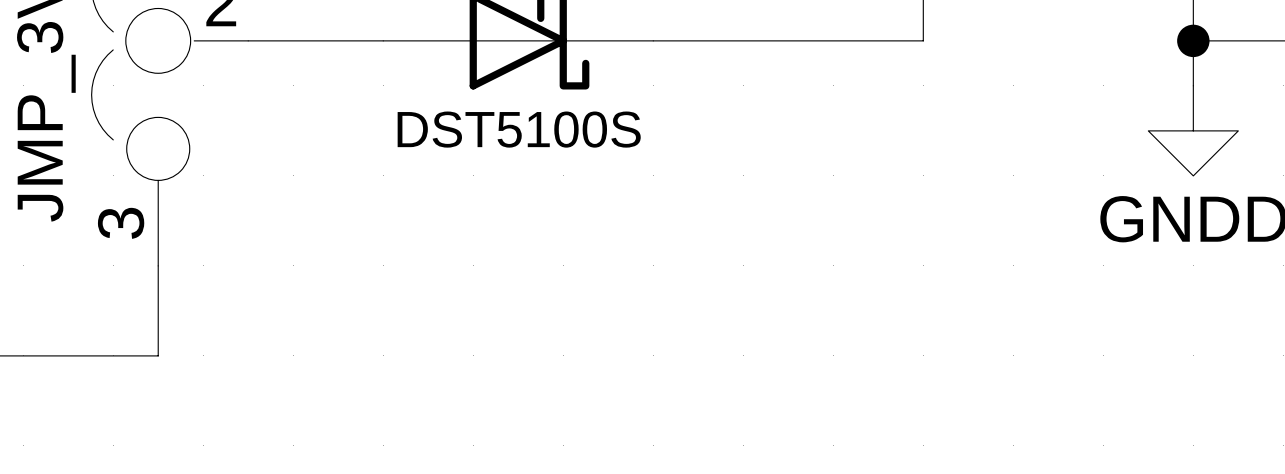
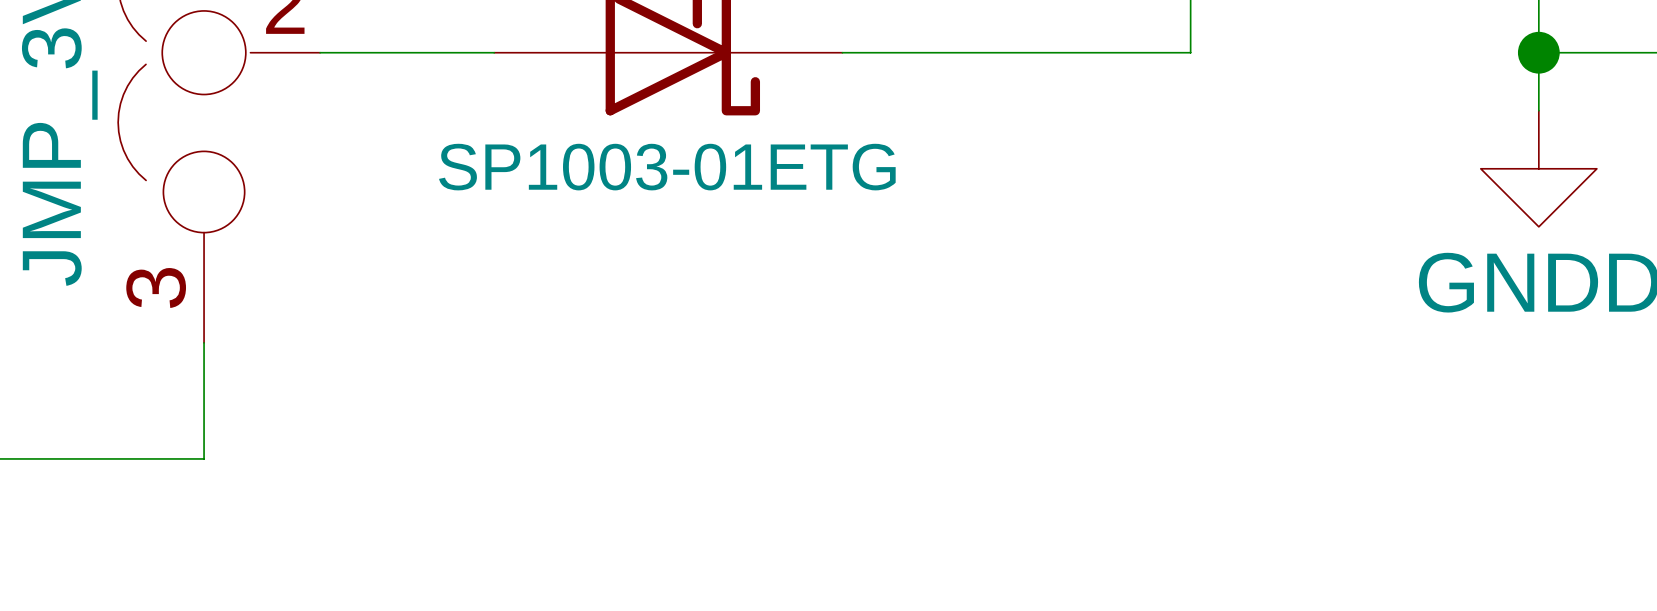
part value: DST5100S (519, 129) -> SP1003-01ETG (667, 167)

